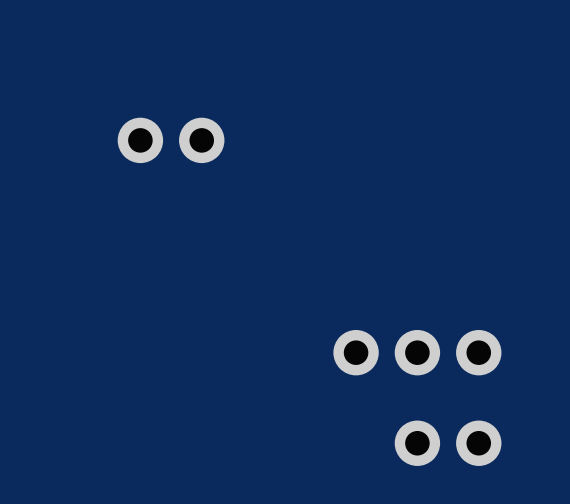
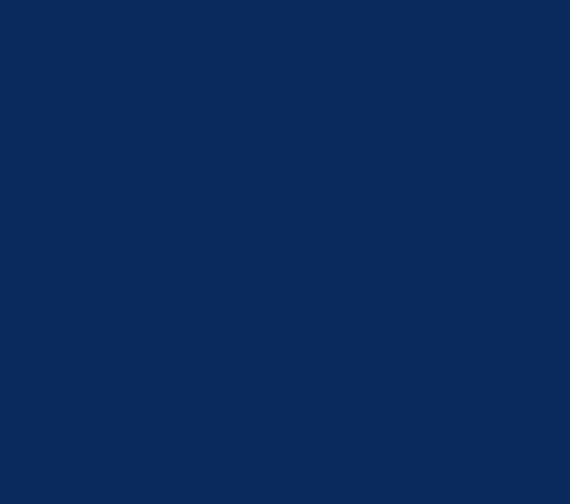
part: (171, 140) -> none
part: (417, 352) -> none
part: (448, 443) -> none

